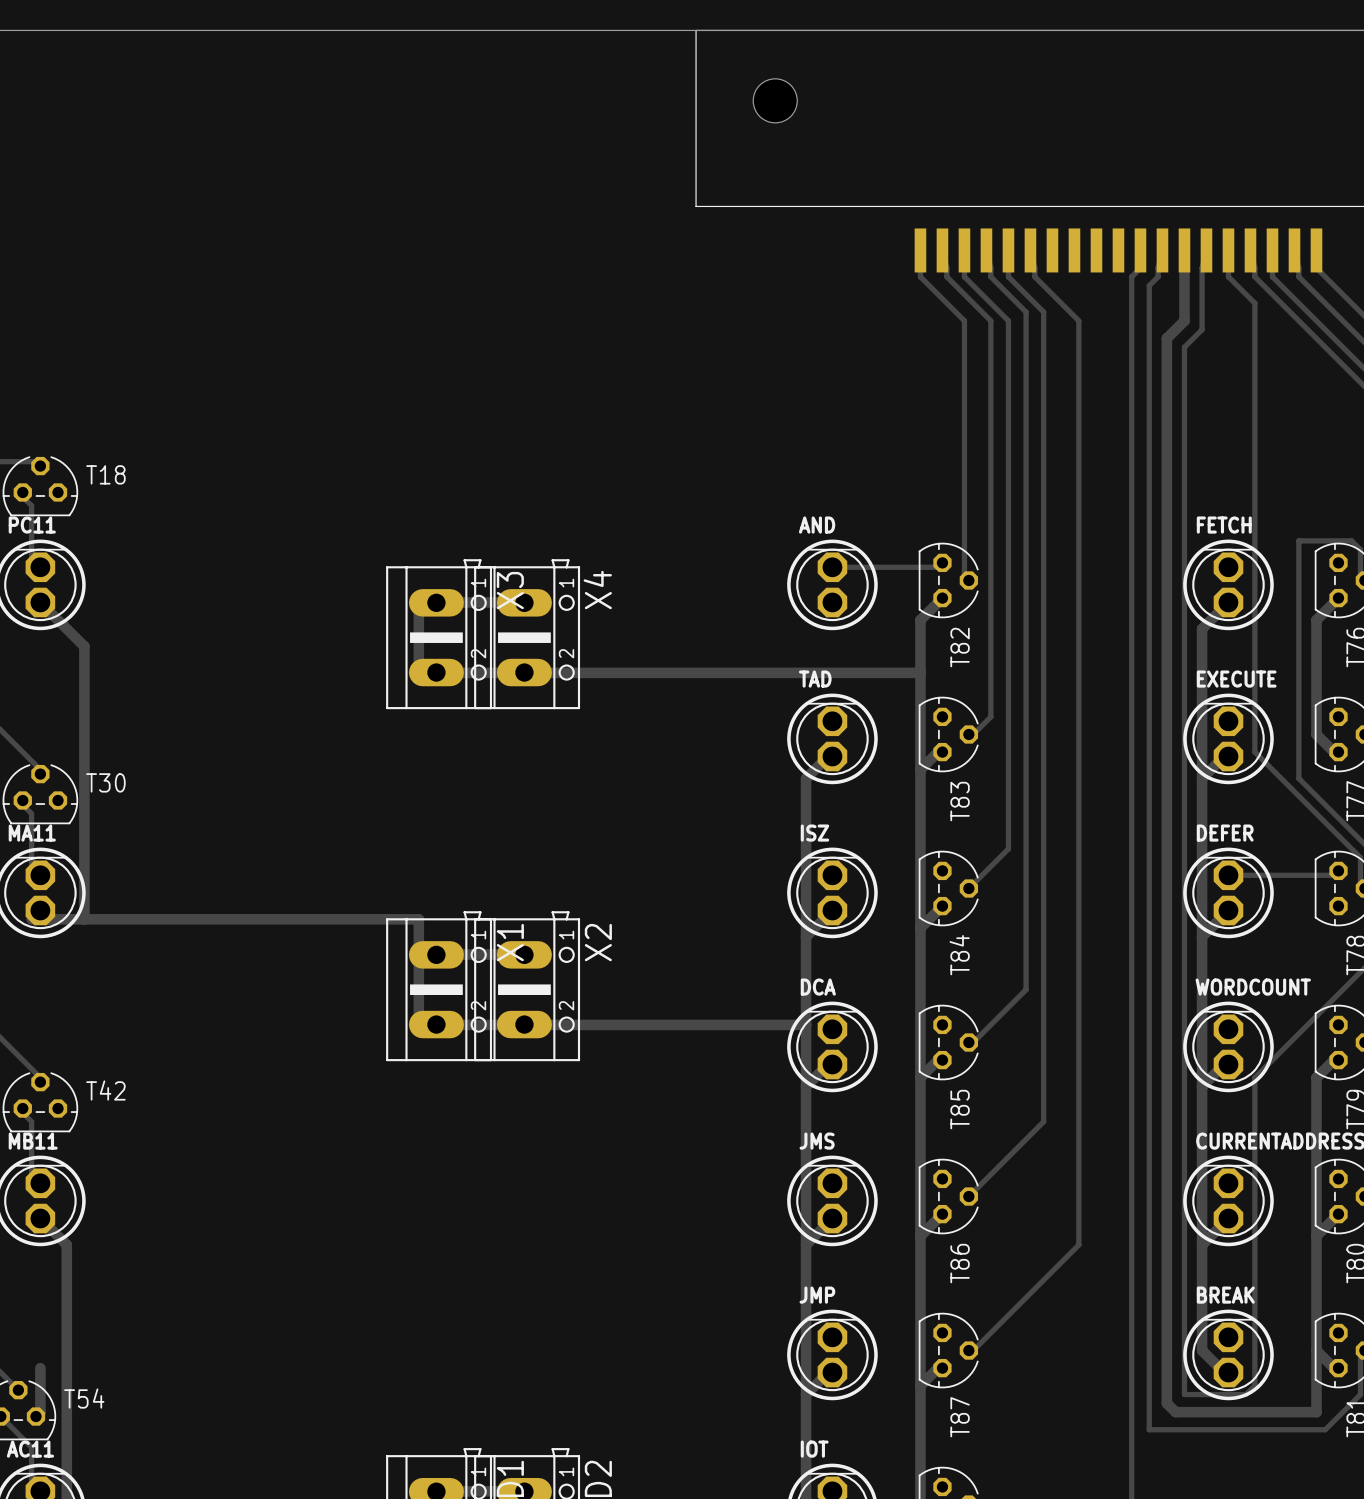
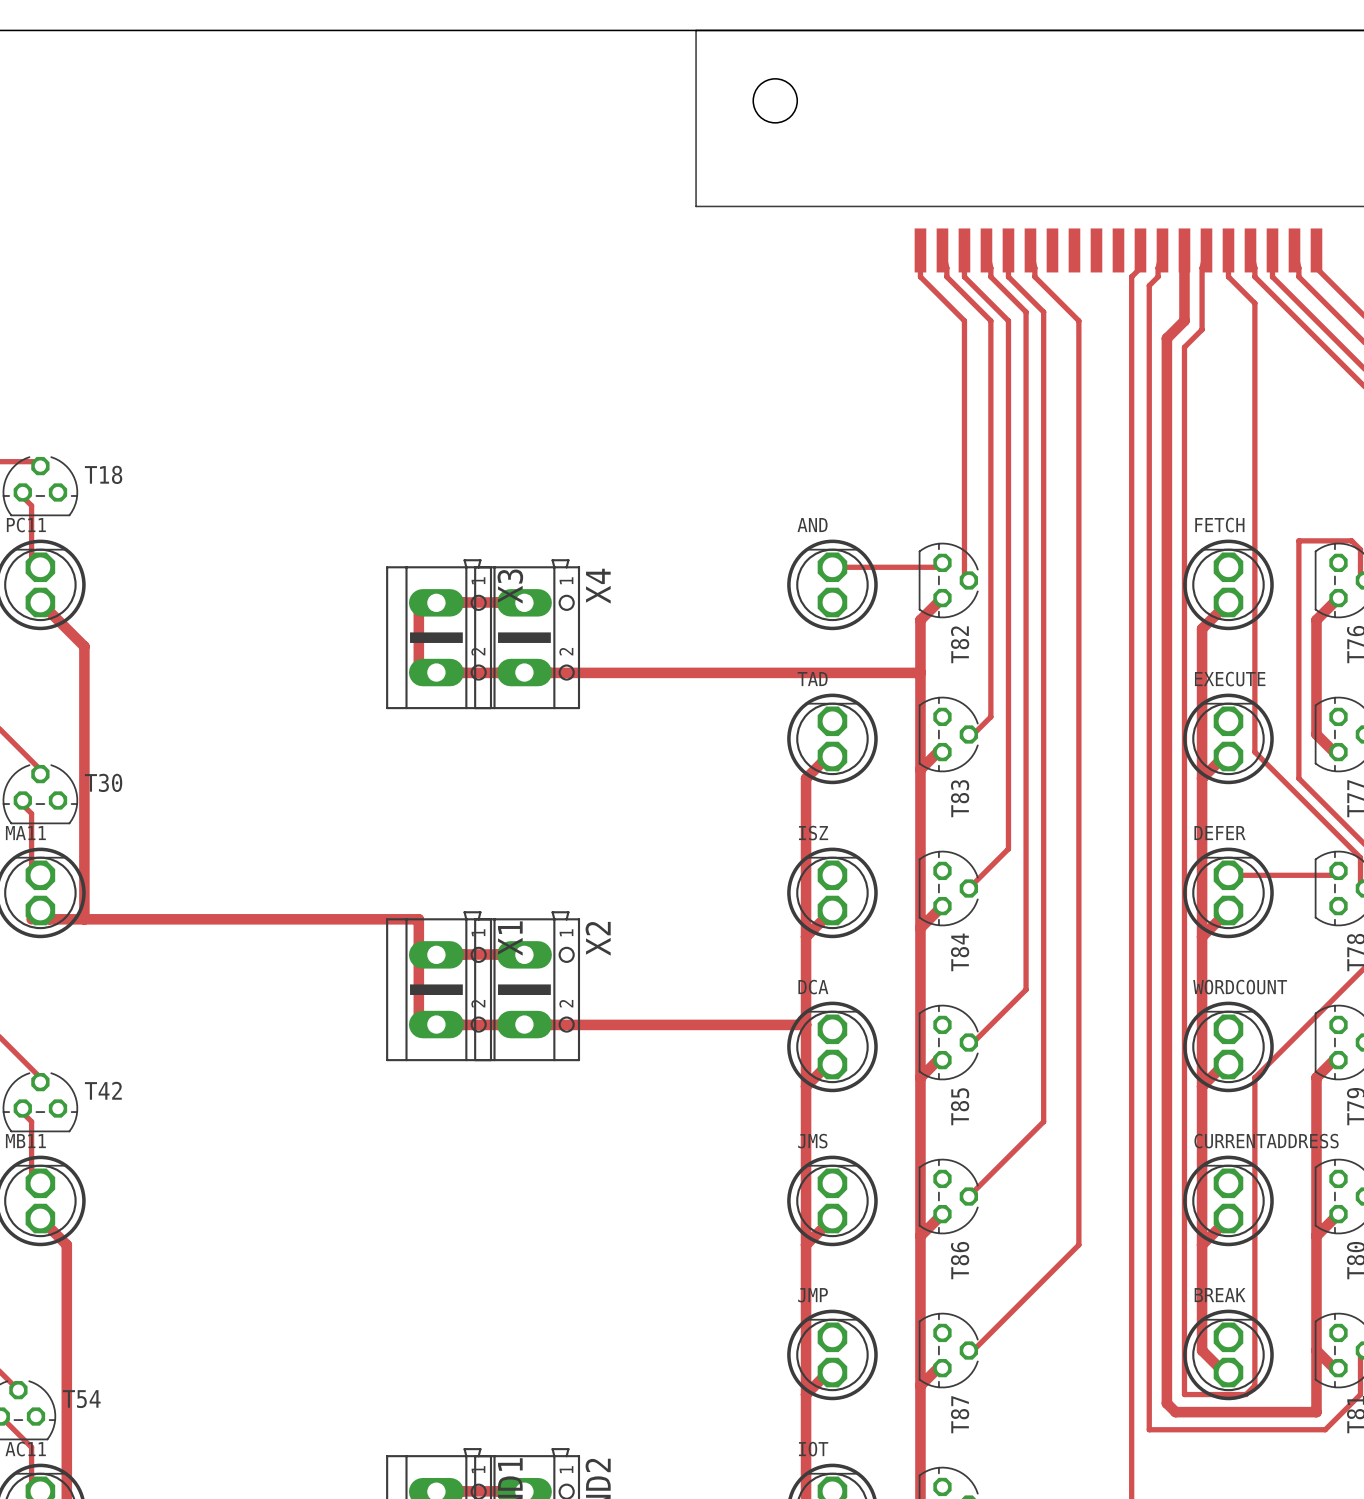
track: (40, 1368) (40, 1412) (35, 1416) -> none

